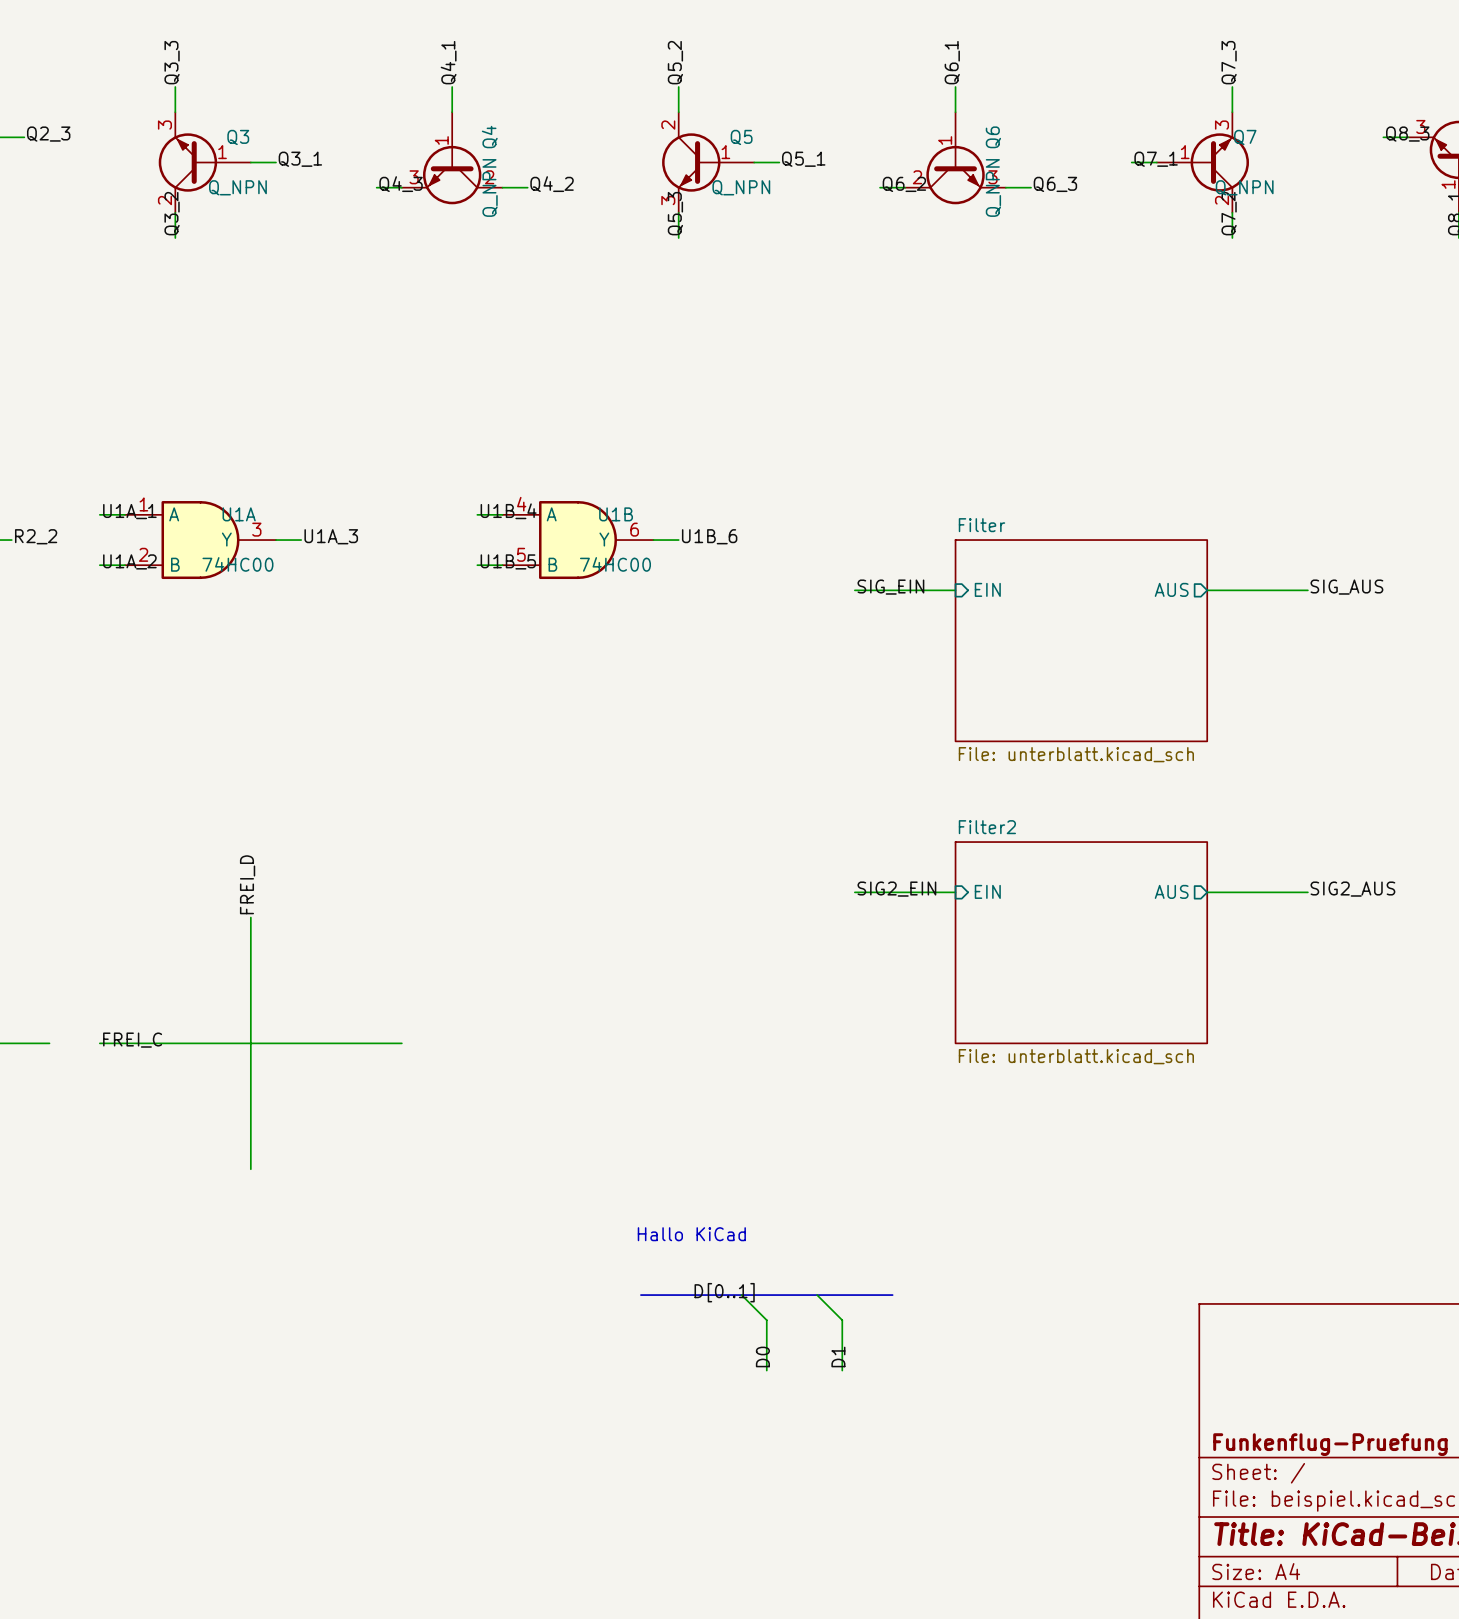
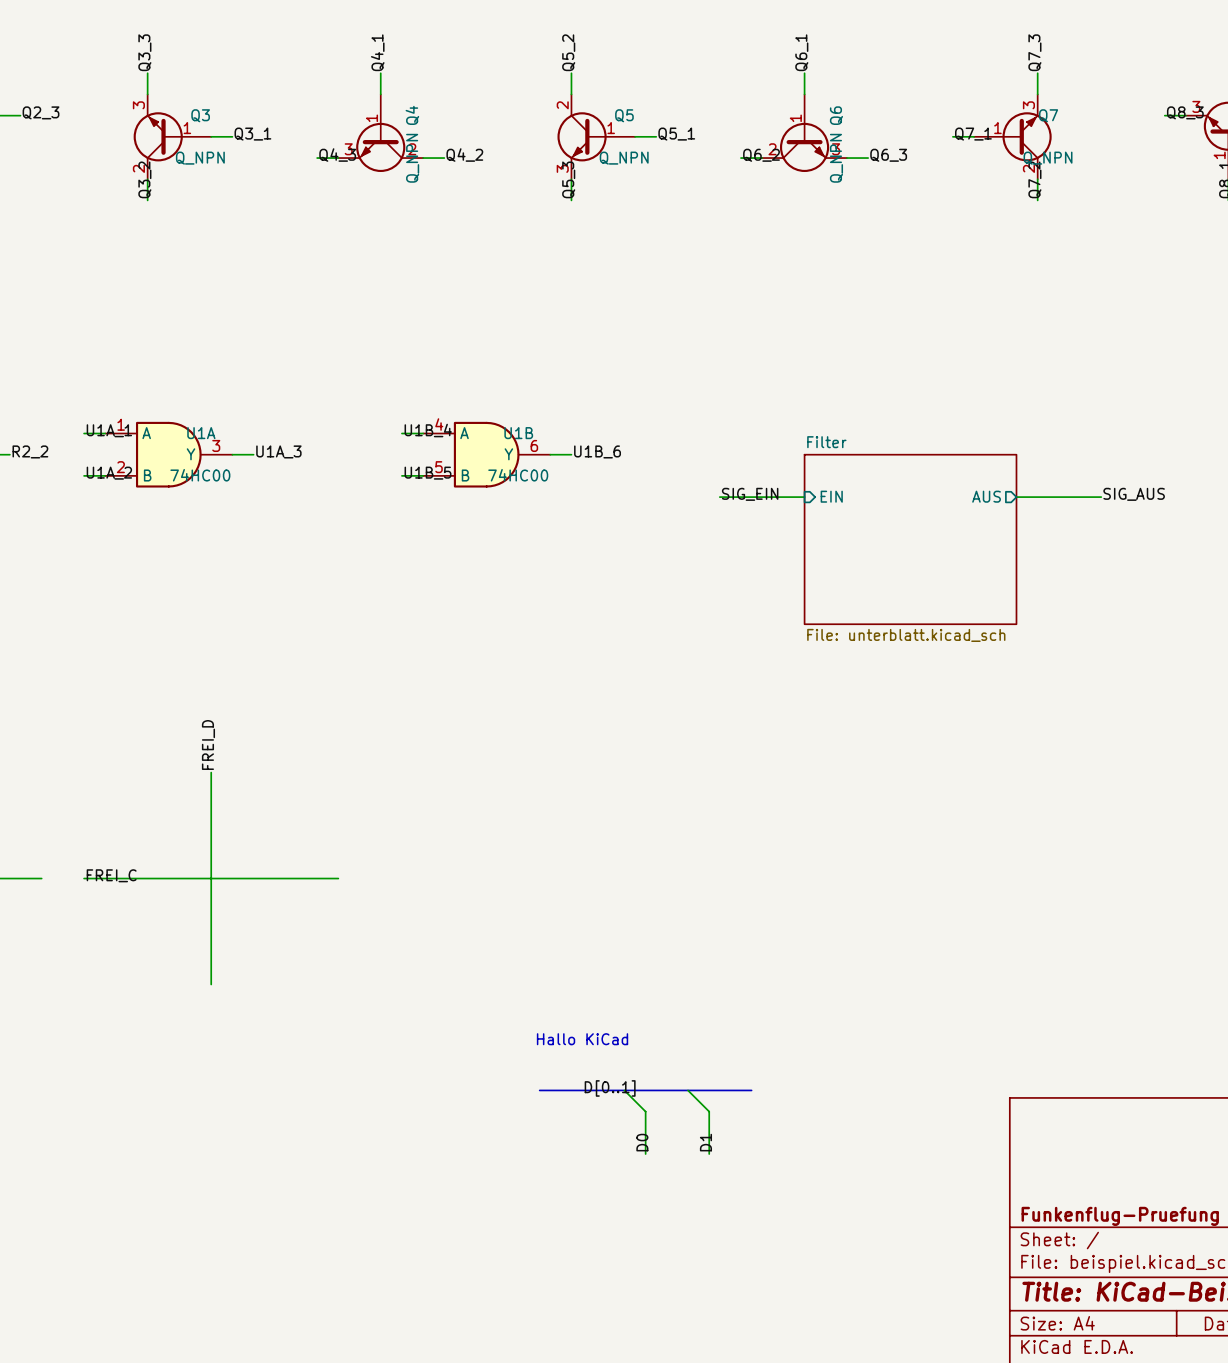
label: SIG2_EIN (896, 889) -> none
label: SIG2_AUS (1352, 889) -> none
sheet pin: EIN (987, 891) -> none
sheet pin: AUS (1171, 891) -> none
wire: (854, 892) (955, 892) -> none
wire: (1207, 892) (1307, 892) -> none
sheet Filter2: File: unterblatt.kicad_sch (1081, 942) -> none

